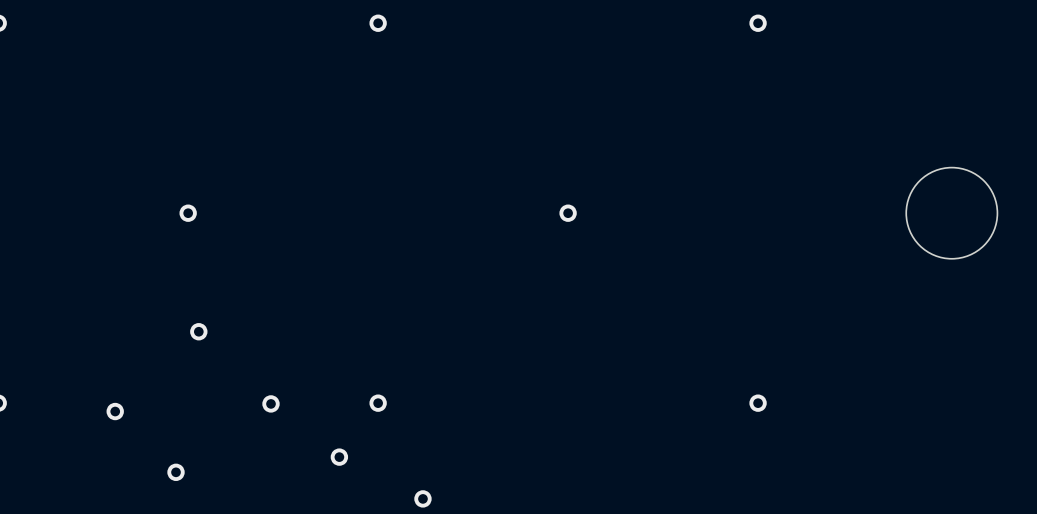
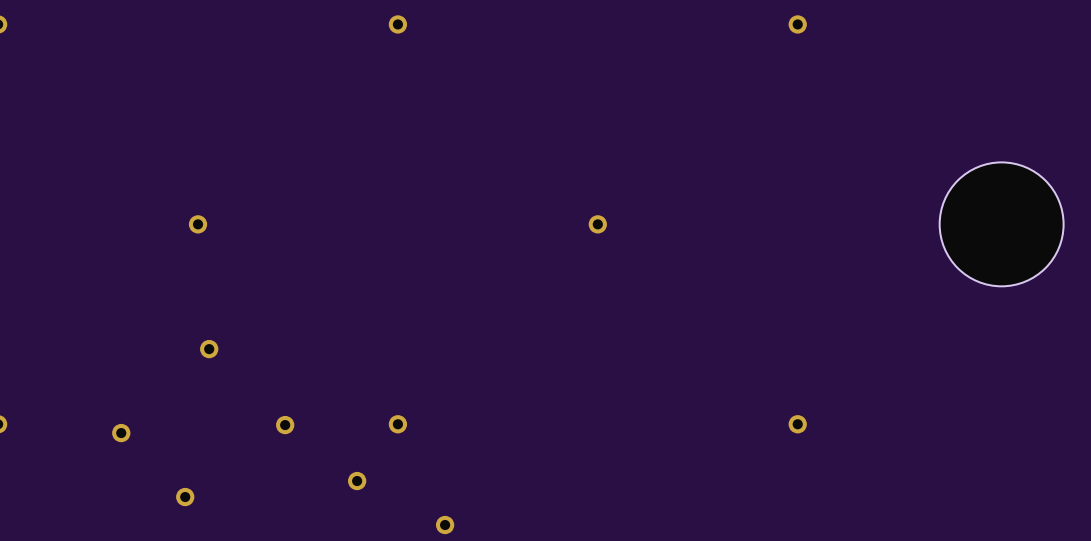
round board edge: [906, 167, 998, 259] -> none
hole: none -> (1001, 224)

